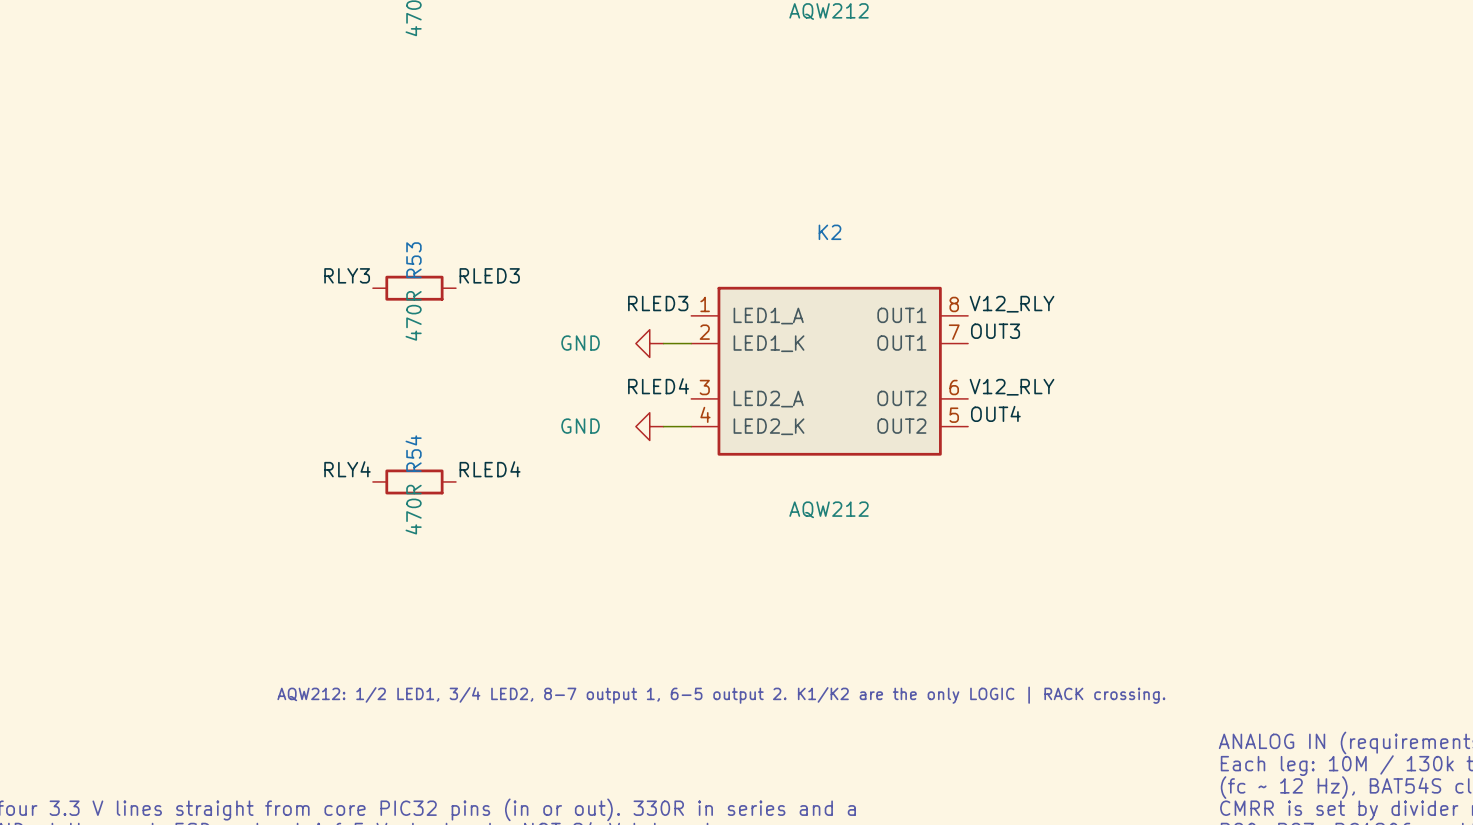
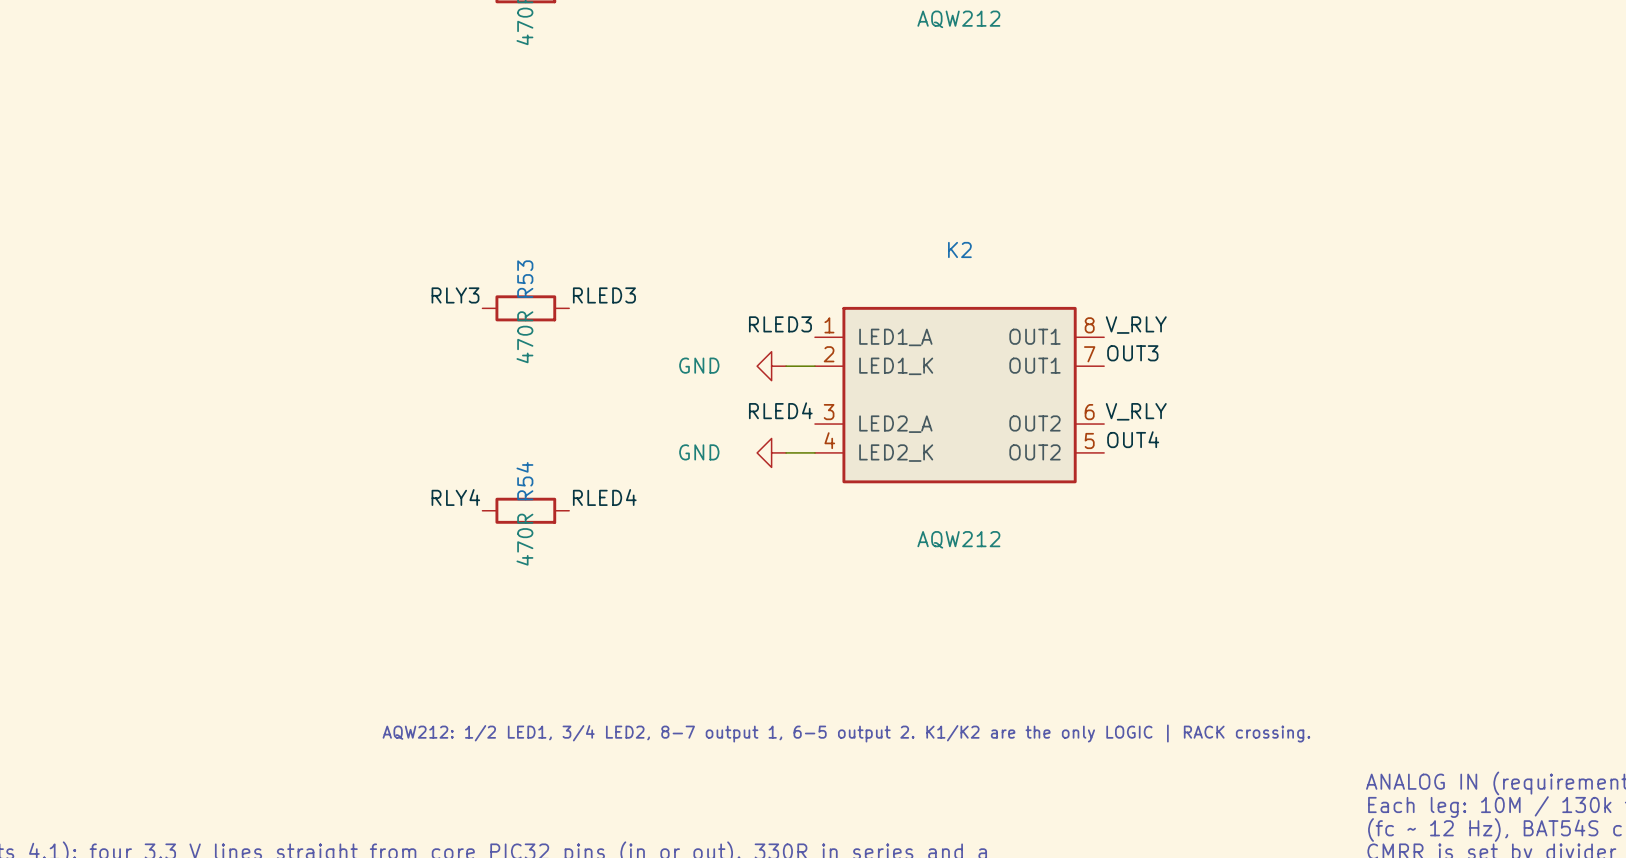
label: V12_RLY (1012, 304) -> V_RLY (1136, 325)
label: V12_RLY (1012, 387) -> V_RLY (1136, 411)

